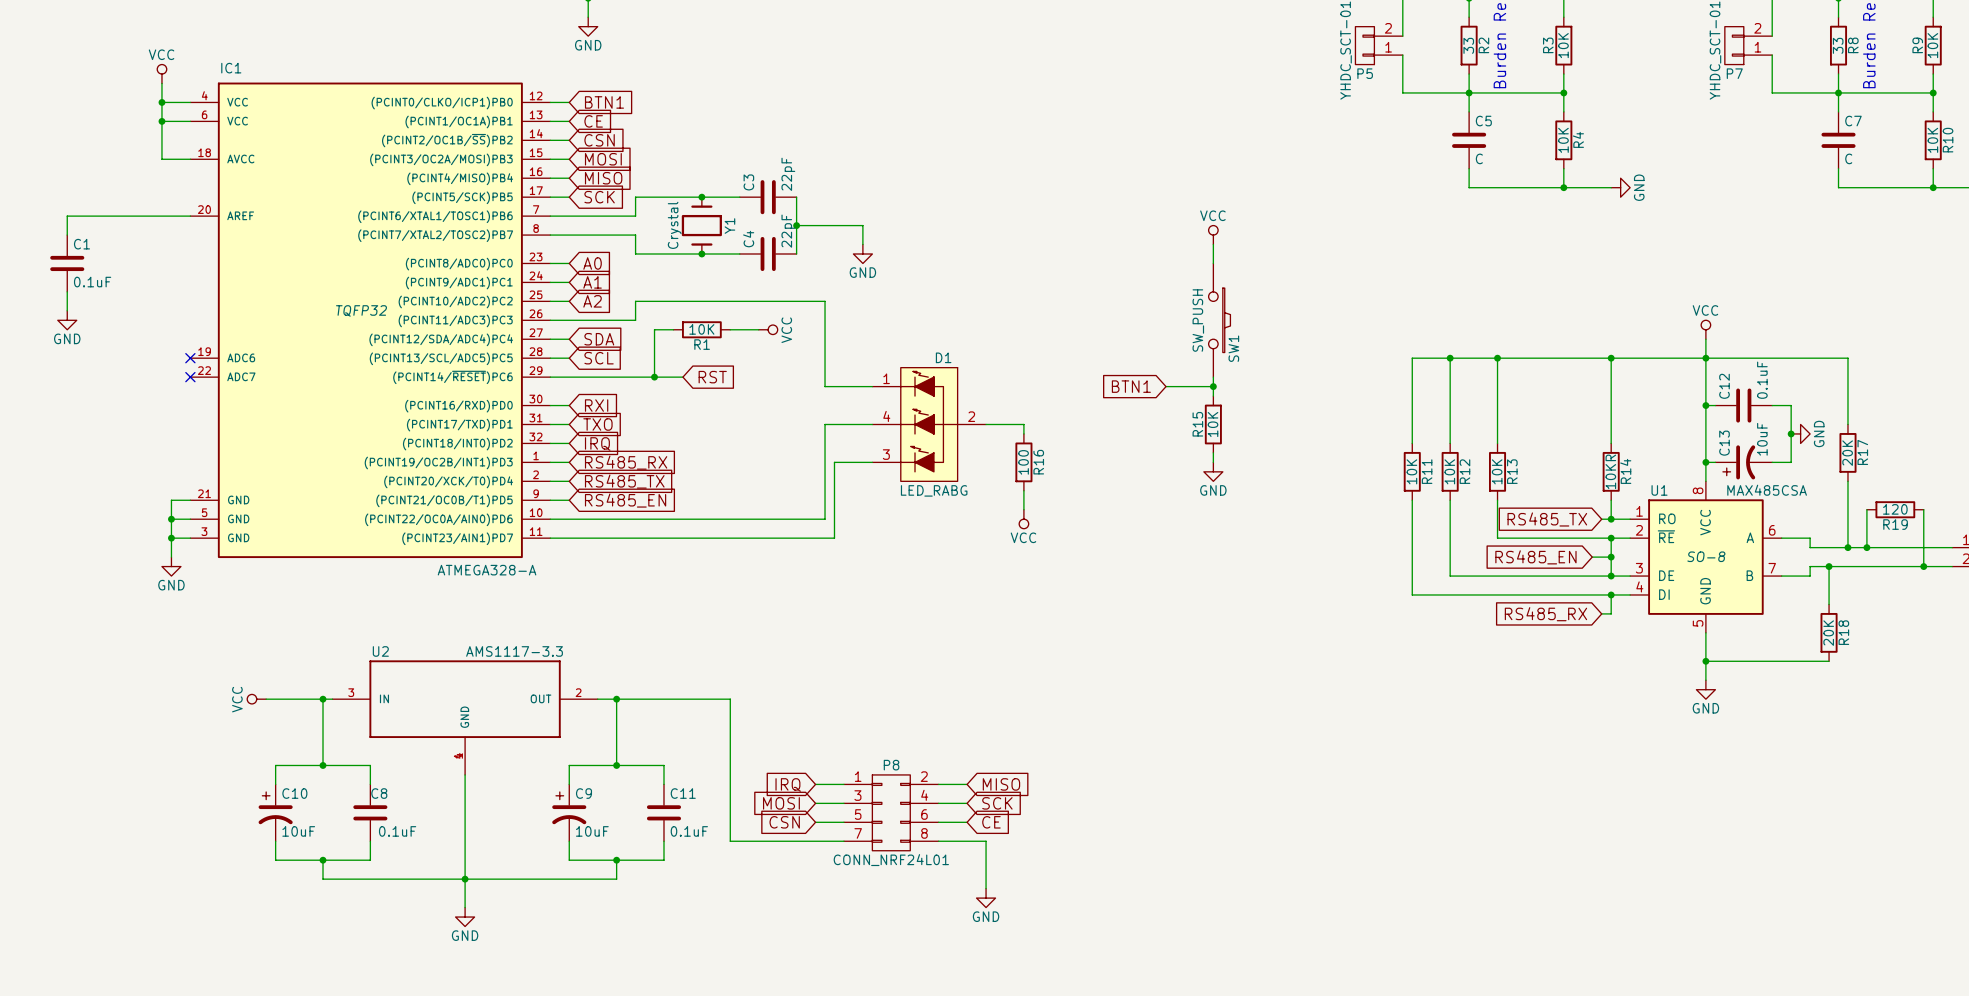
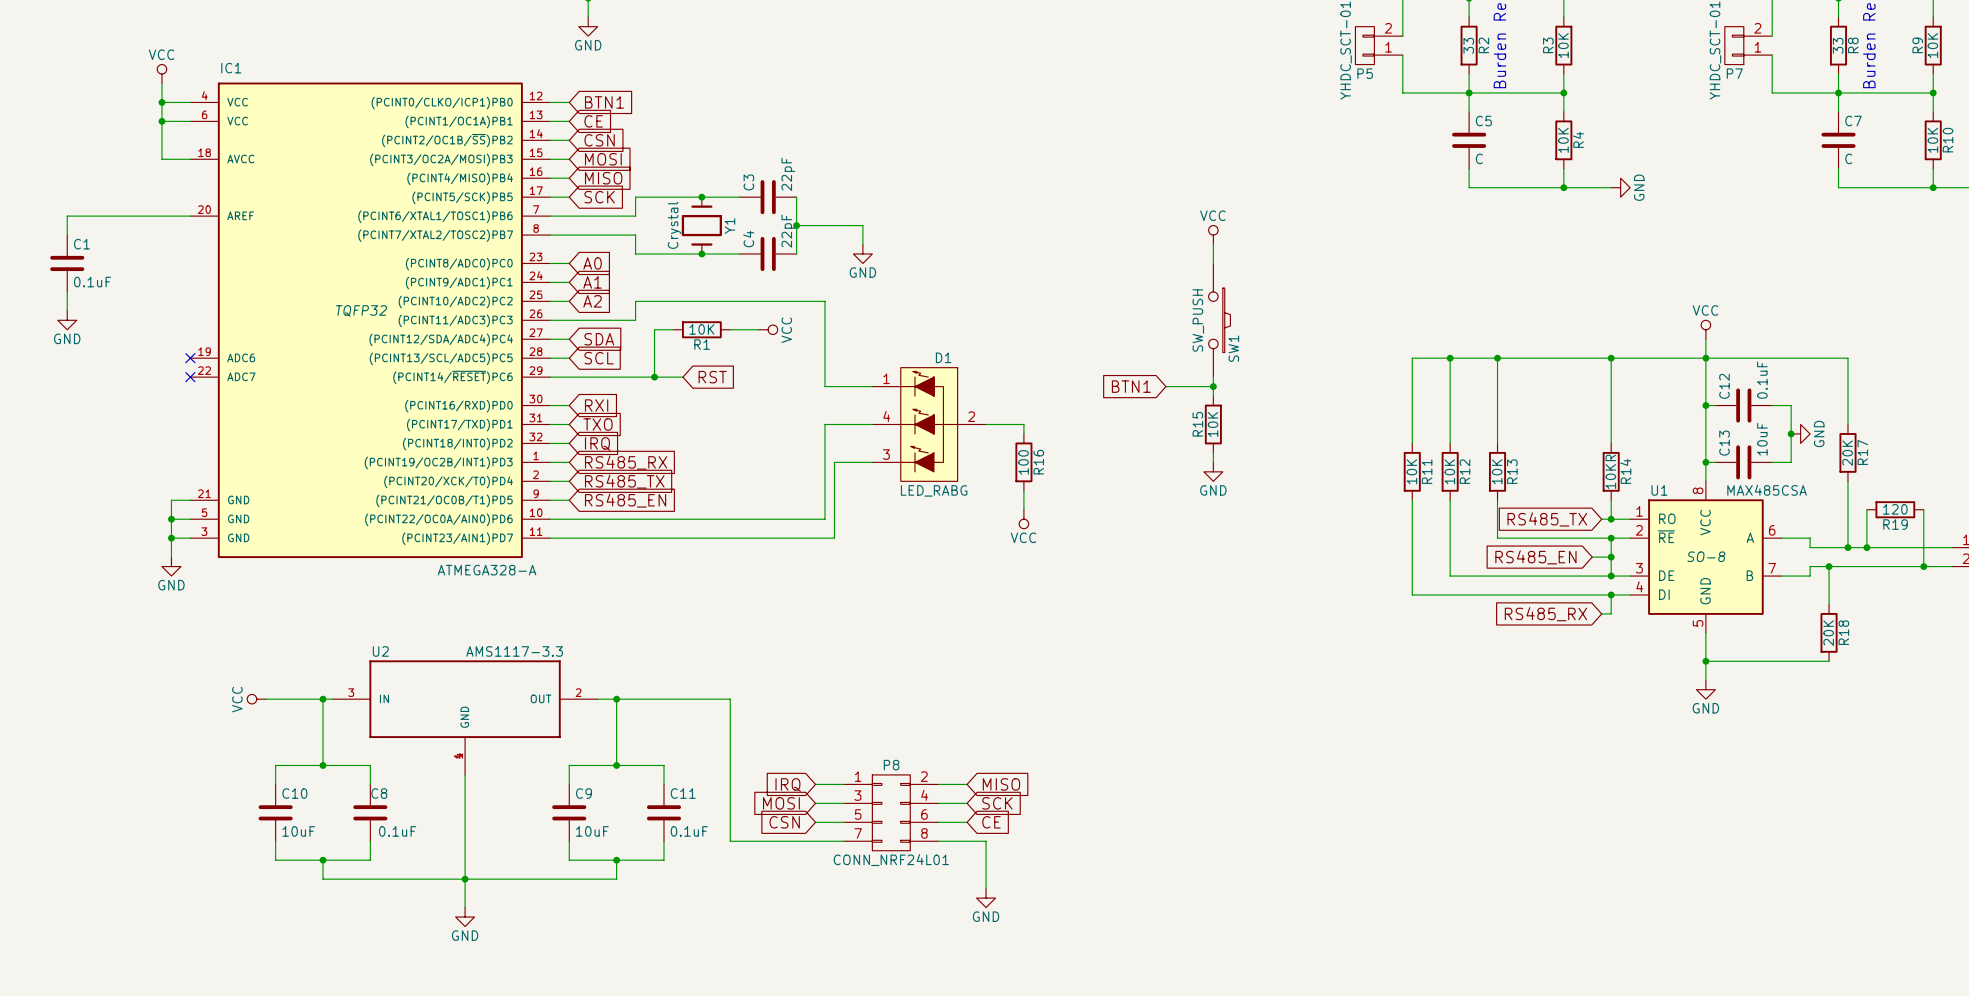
C13 symbol: [1715, 445, 1773, 480] -> [1715, 445, 1773, 480]
C10 symbol: [258, 784, 293, 842] -> [258, 784, 293, 842]
C9 symbol: [552, 784, 587, 842] -> [552, 784, 587, 842]

